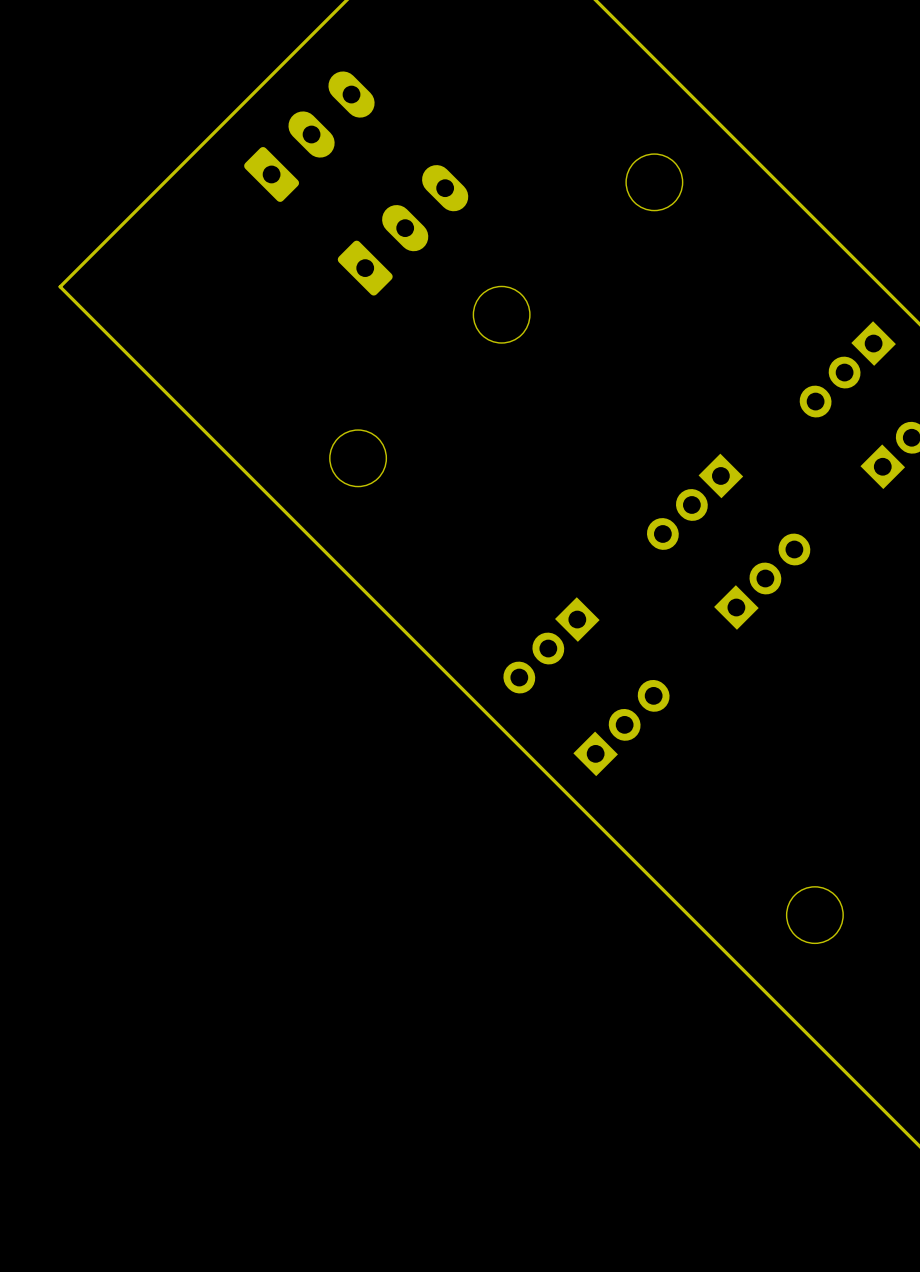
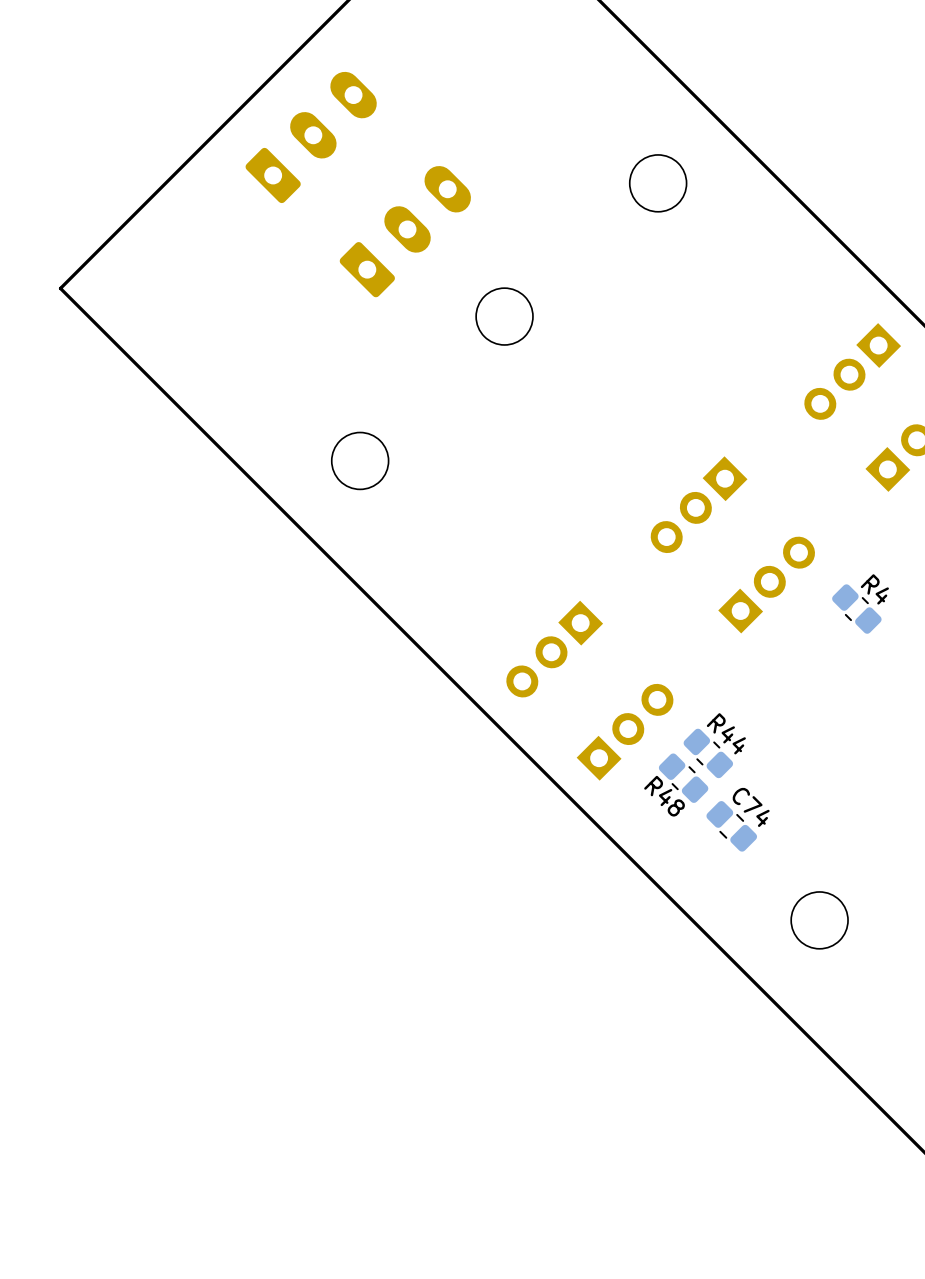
R4: none -> (856, 609)
R44: none -> (708, 753)
R48: none -> (683, 778)
C74: none -> (731, 826)

